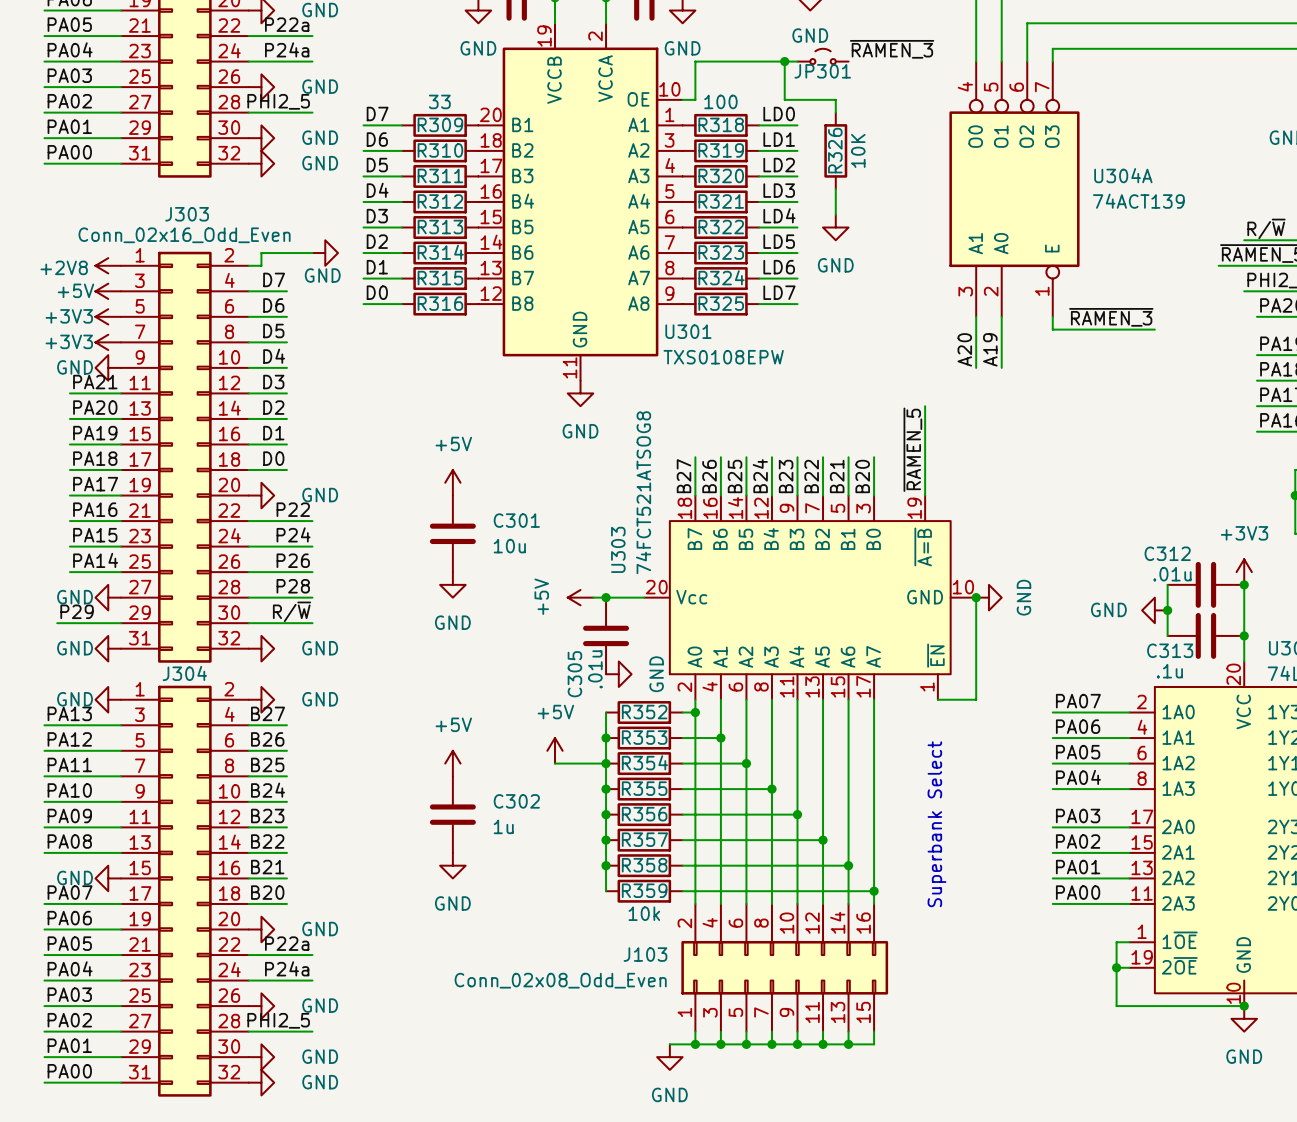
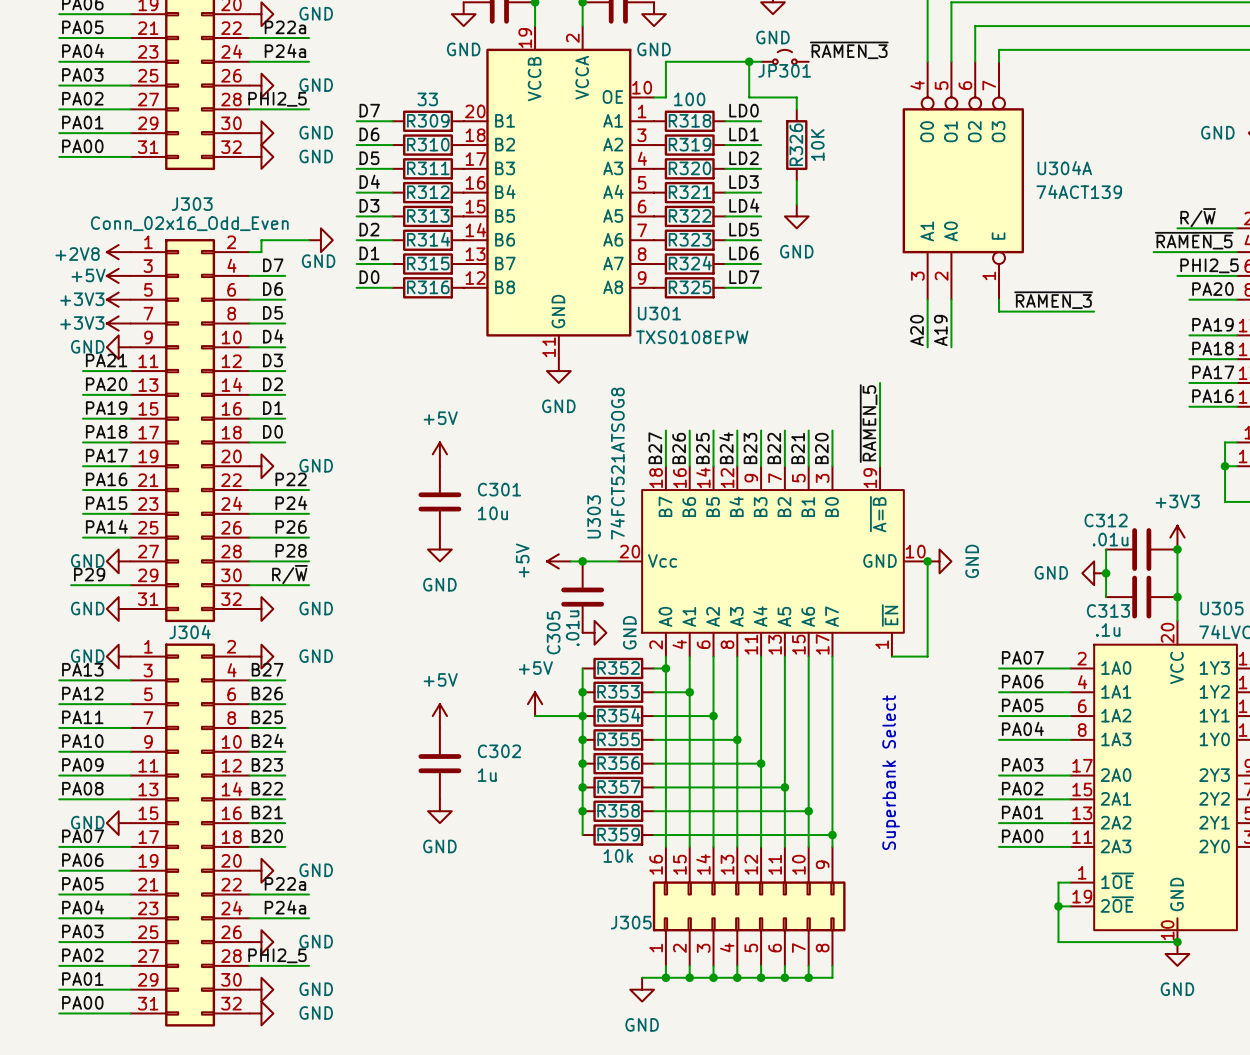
J103 symbol: [681, 903, 889, 1032] -> [652, 846, 846, 966]
J103 name: J103 (645, 954) -> J305 (631, 922)
J103 value: Conn_02x08_Odd_Even (560, 980) -> none

